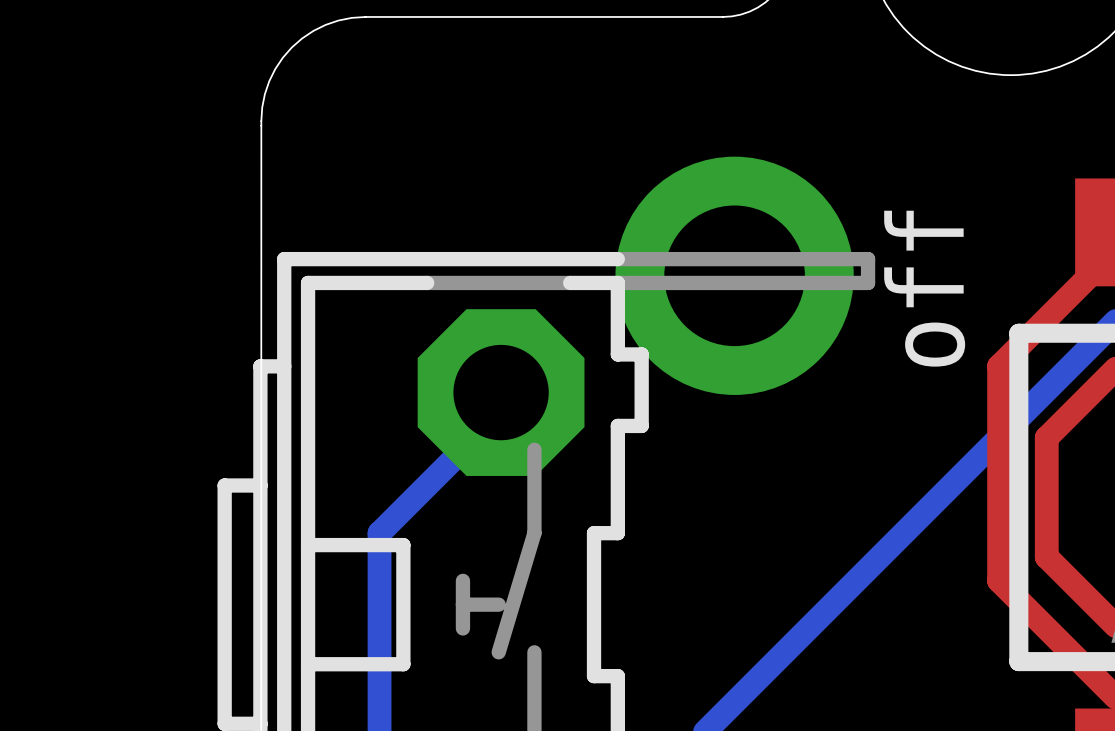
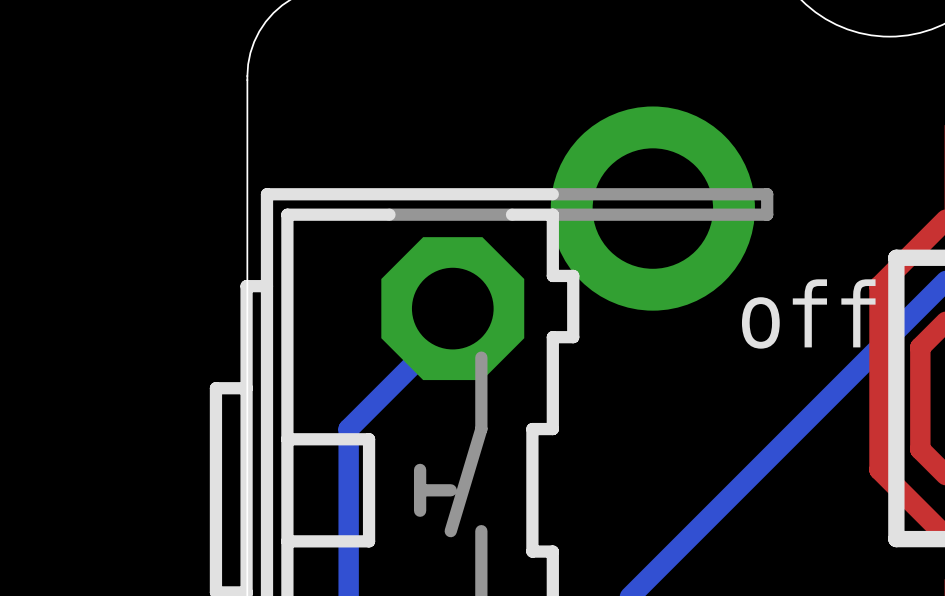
text rotation: 0° (924, 288) -> 90° clockwise (808, 313)

